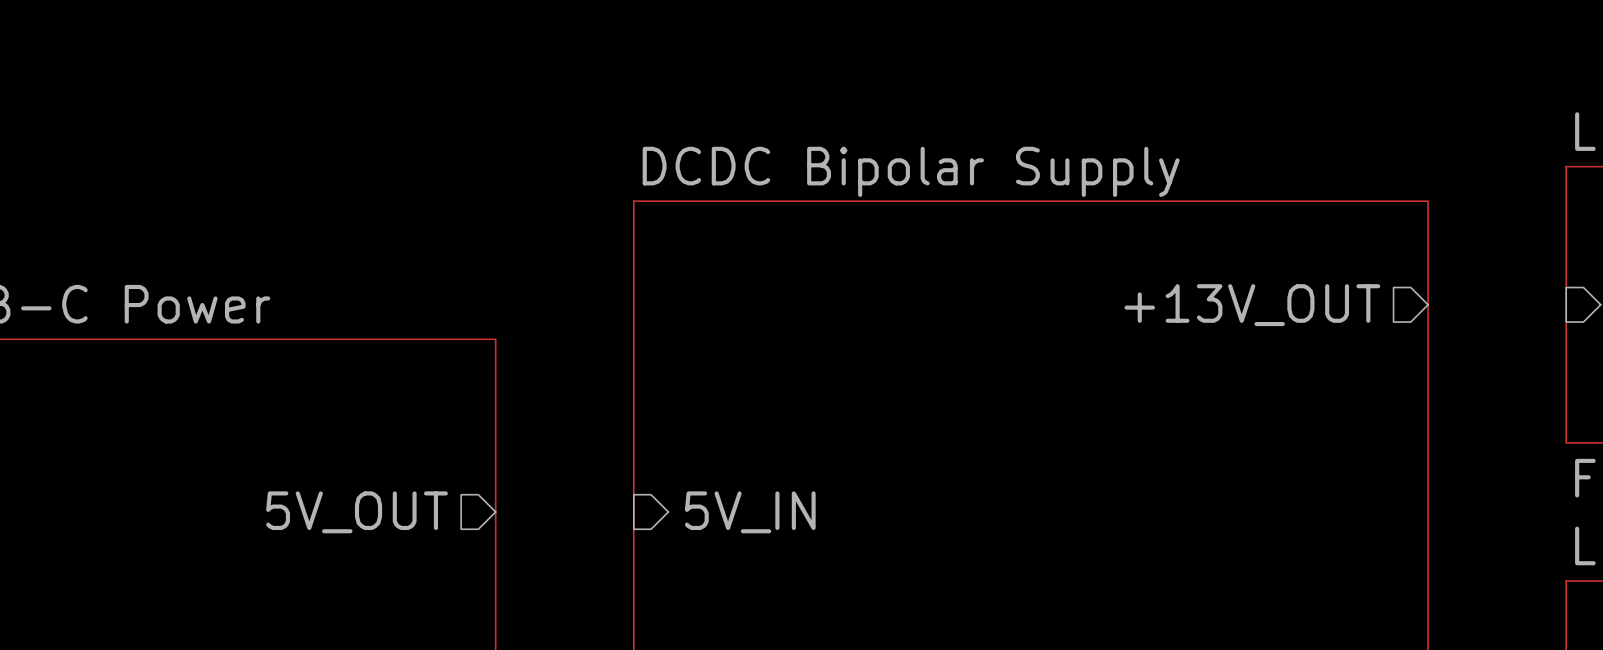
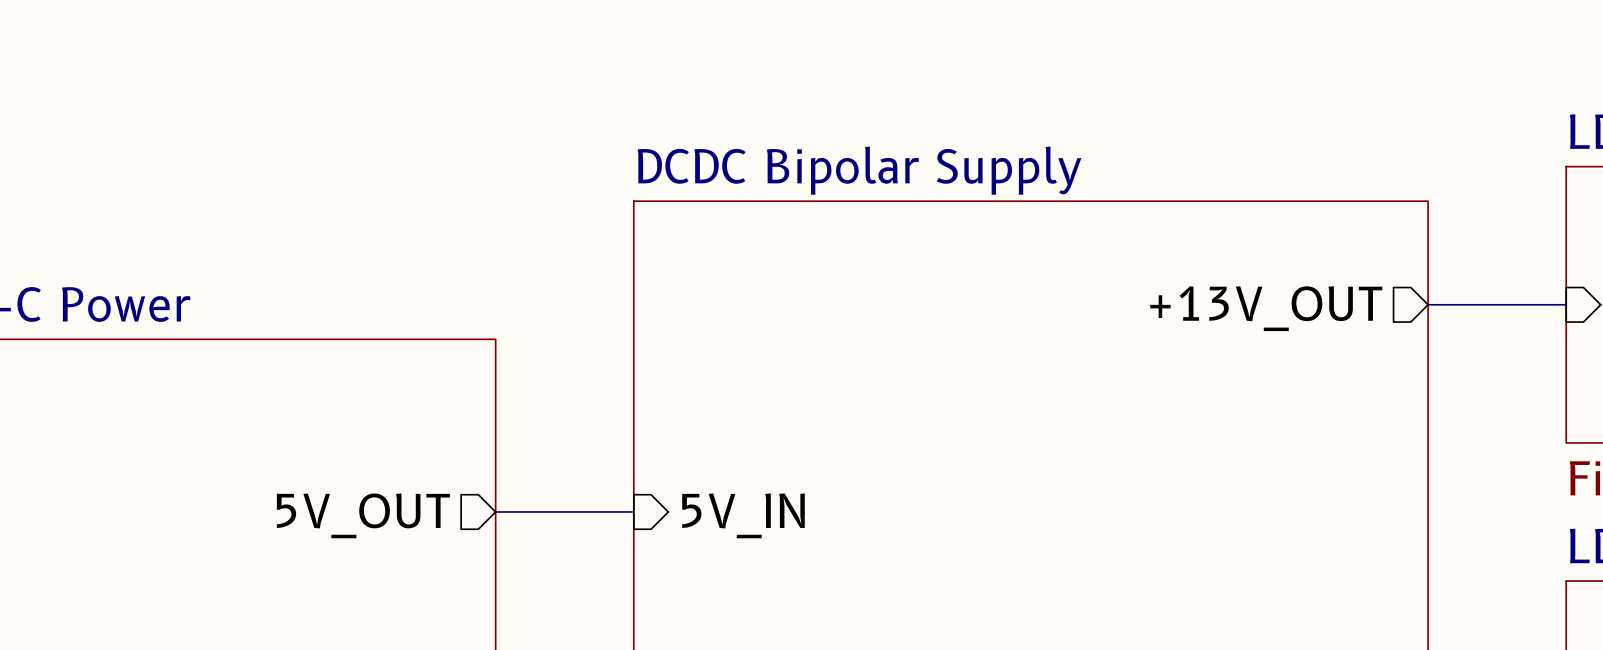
wire: none -> (1428, 304) (1566, 304)
wire: none -> (495, 511) (633, 511)

